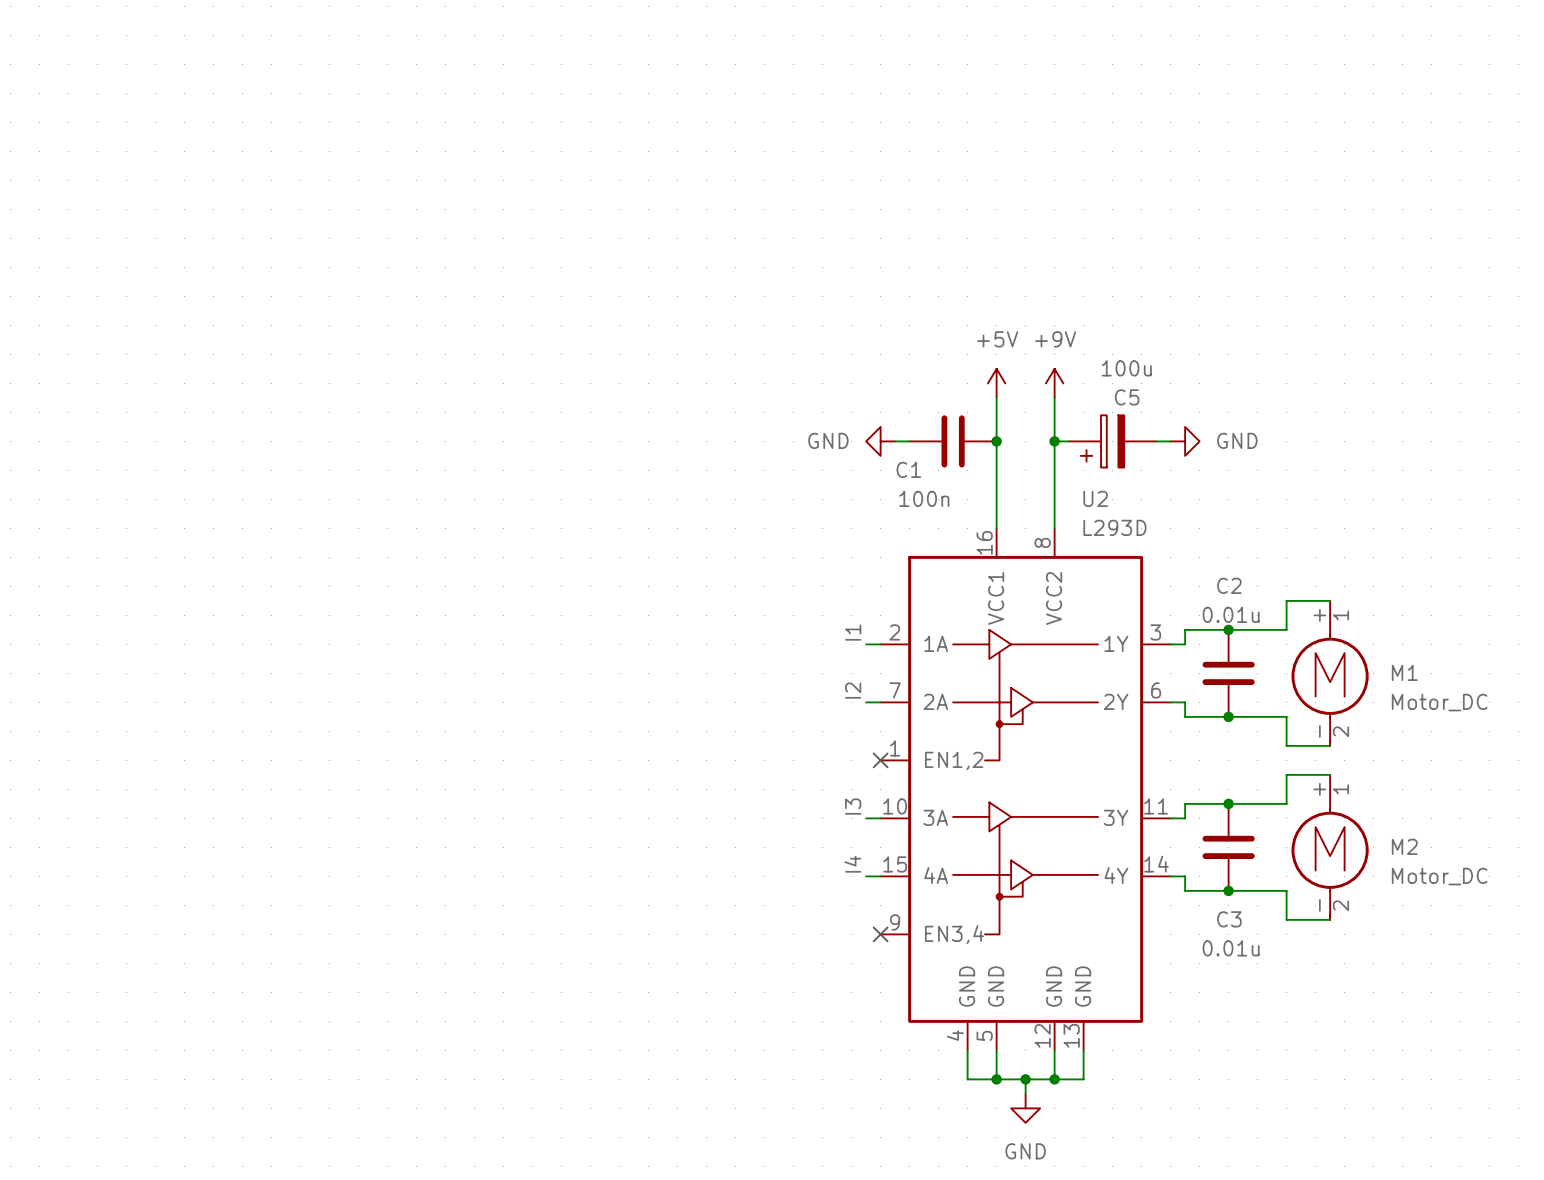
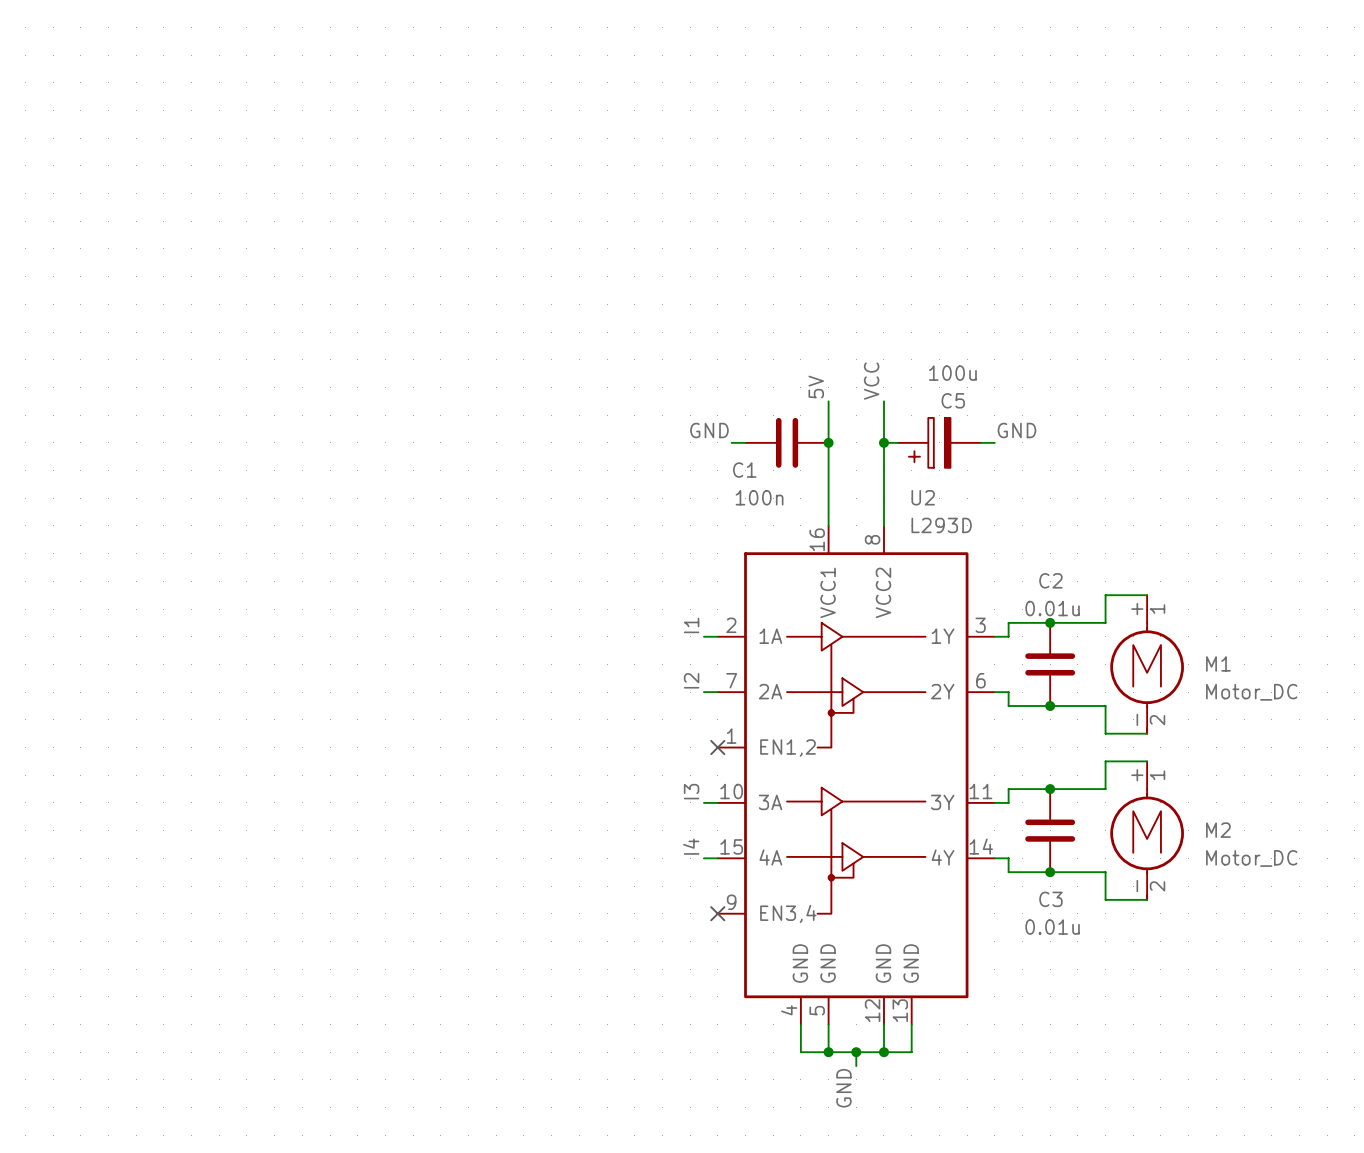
label: none -> VCC (871, 381)
label: none -> 5V (816, 387)
power symbol: +5V (996, 383) -> none
power symbol: +9V (1054, 383) -> none
label: none -> GND (709, 430)
label: none -> GND (1016, 430)
power symbol: GND (880, 441) -> none
power symbol: GND (1185, 441) -> none
power symbol: GND (1025, 1108) -> none
label: none -> GND (843, 1088)

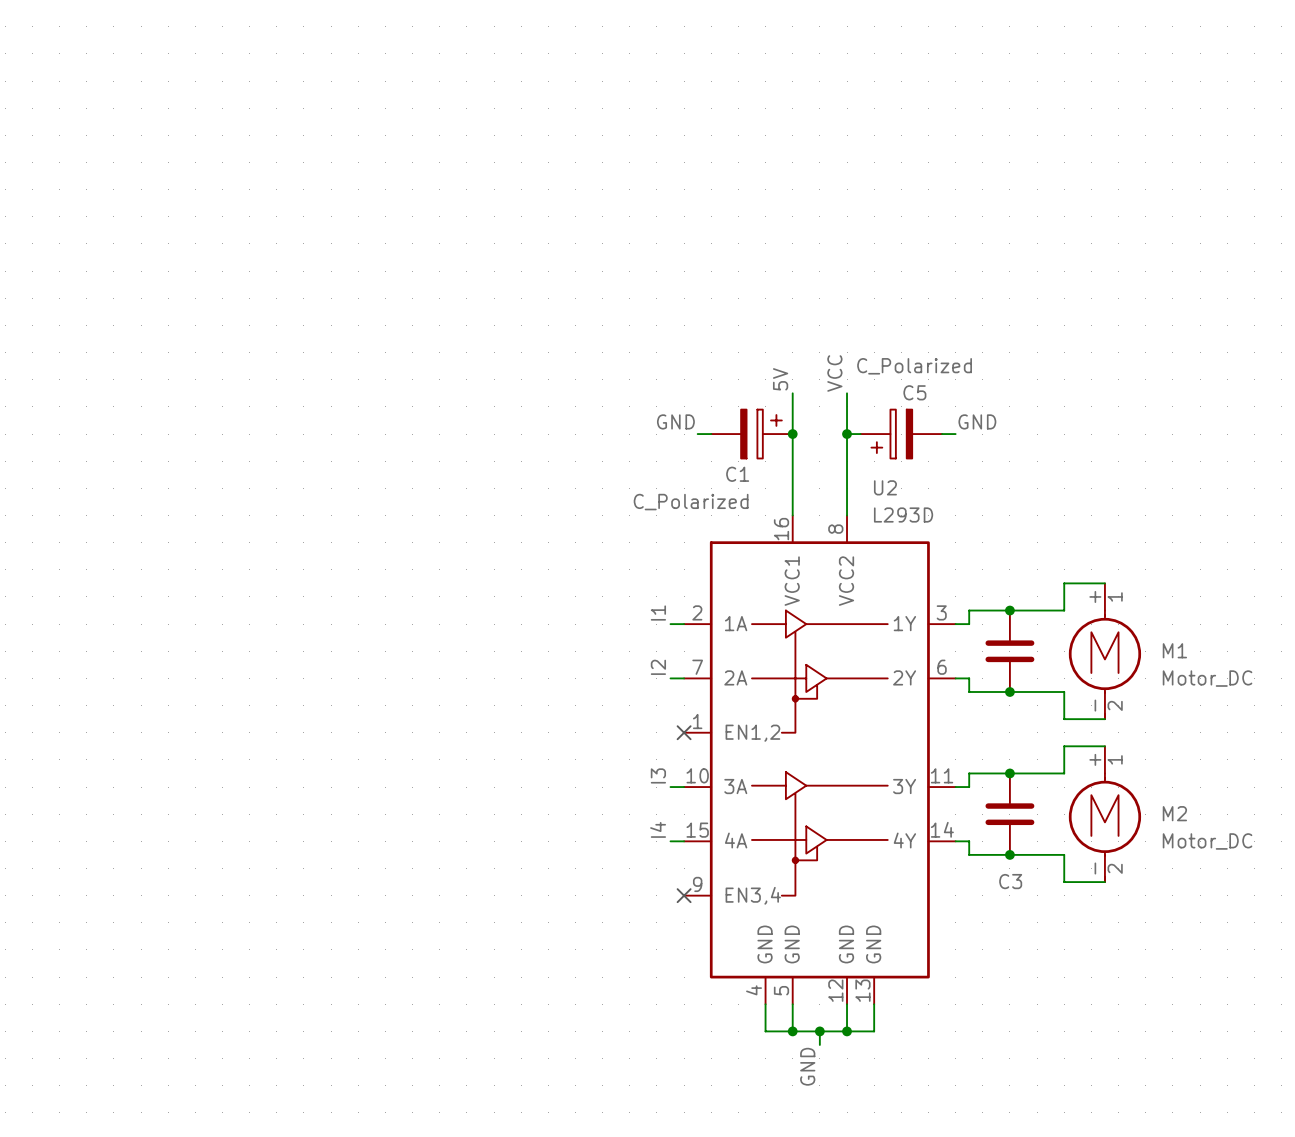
C5 value: 100u (952, 373) -> C_Polarized (914, 366)
C1 symbol: [745, 417, 829, 468] -> [711, 409, 793, 459]
C1 name position: C1 (744, 470) -> C1 (737, 474)
C1 value: 100n (759, 497) -> C_Polarized (691, 502)
C2 name: C2 (1050, 580) -> none
C2 value: 0.01u (1052, 608) -> none
C3 value: 0.01u (1052, 927) -> none

